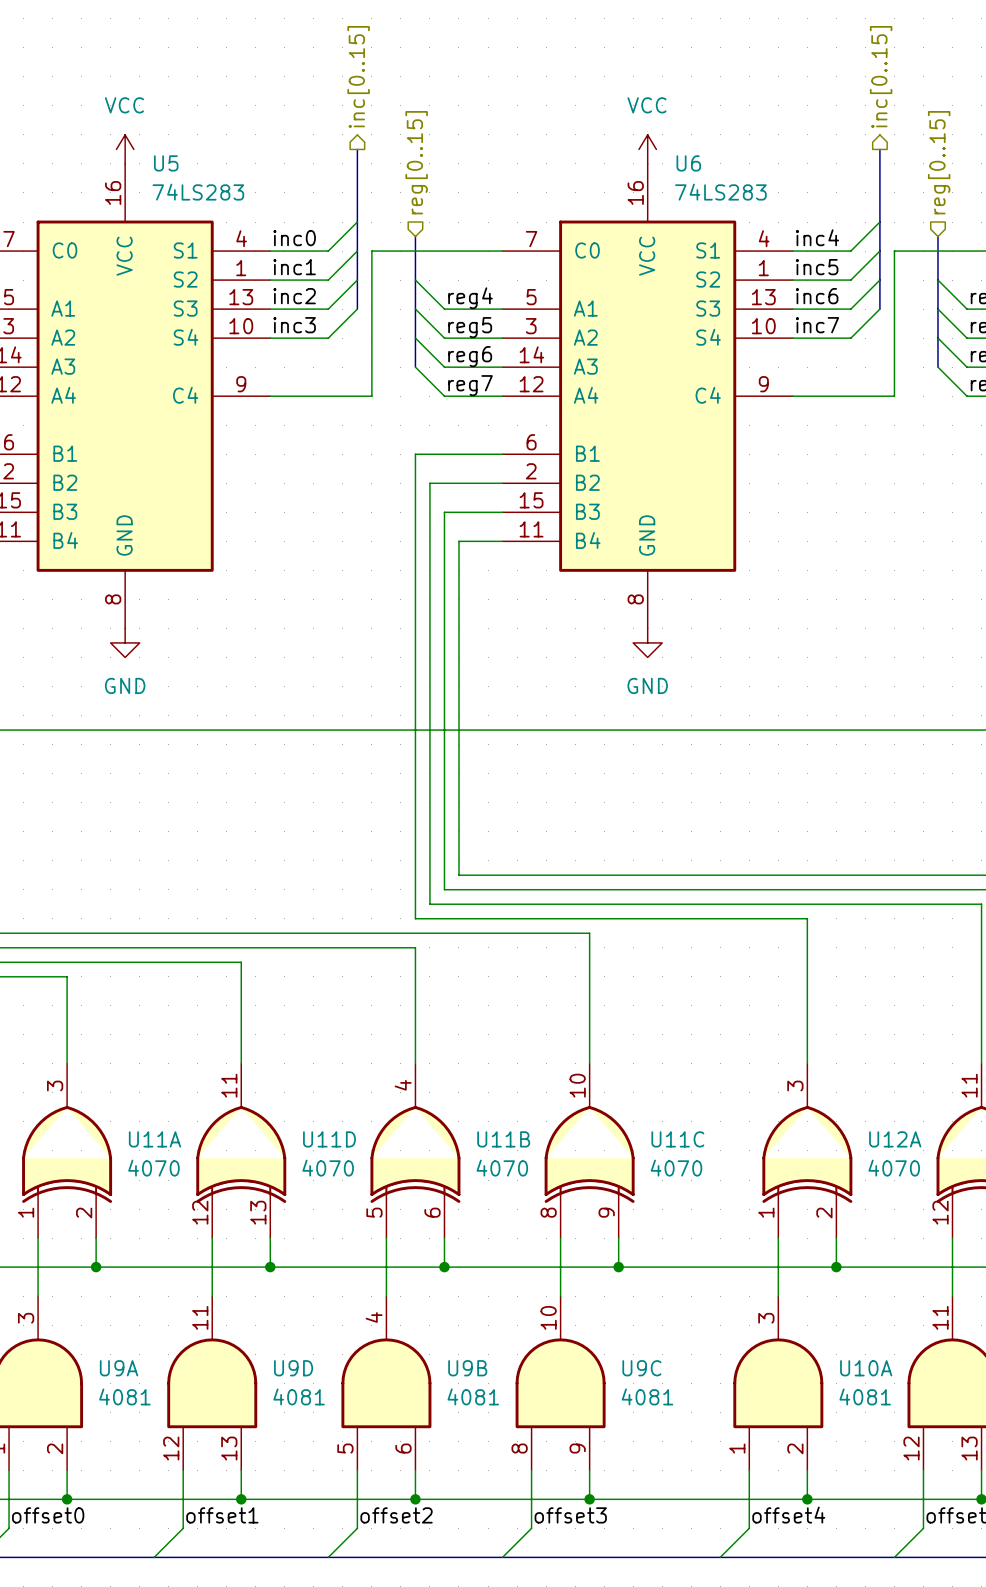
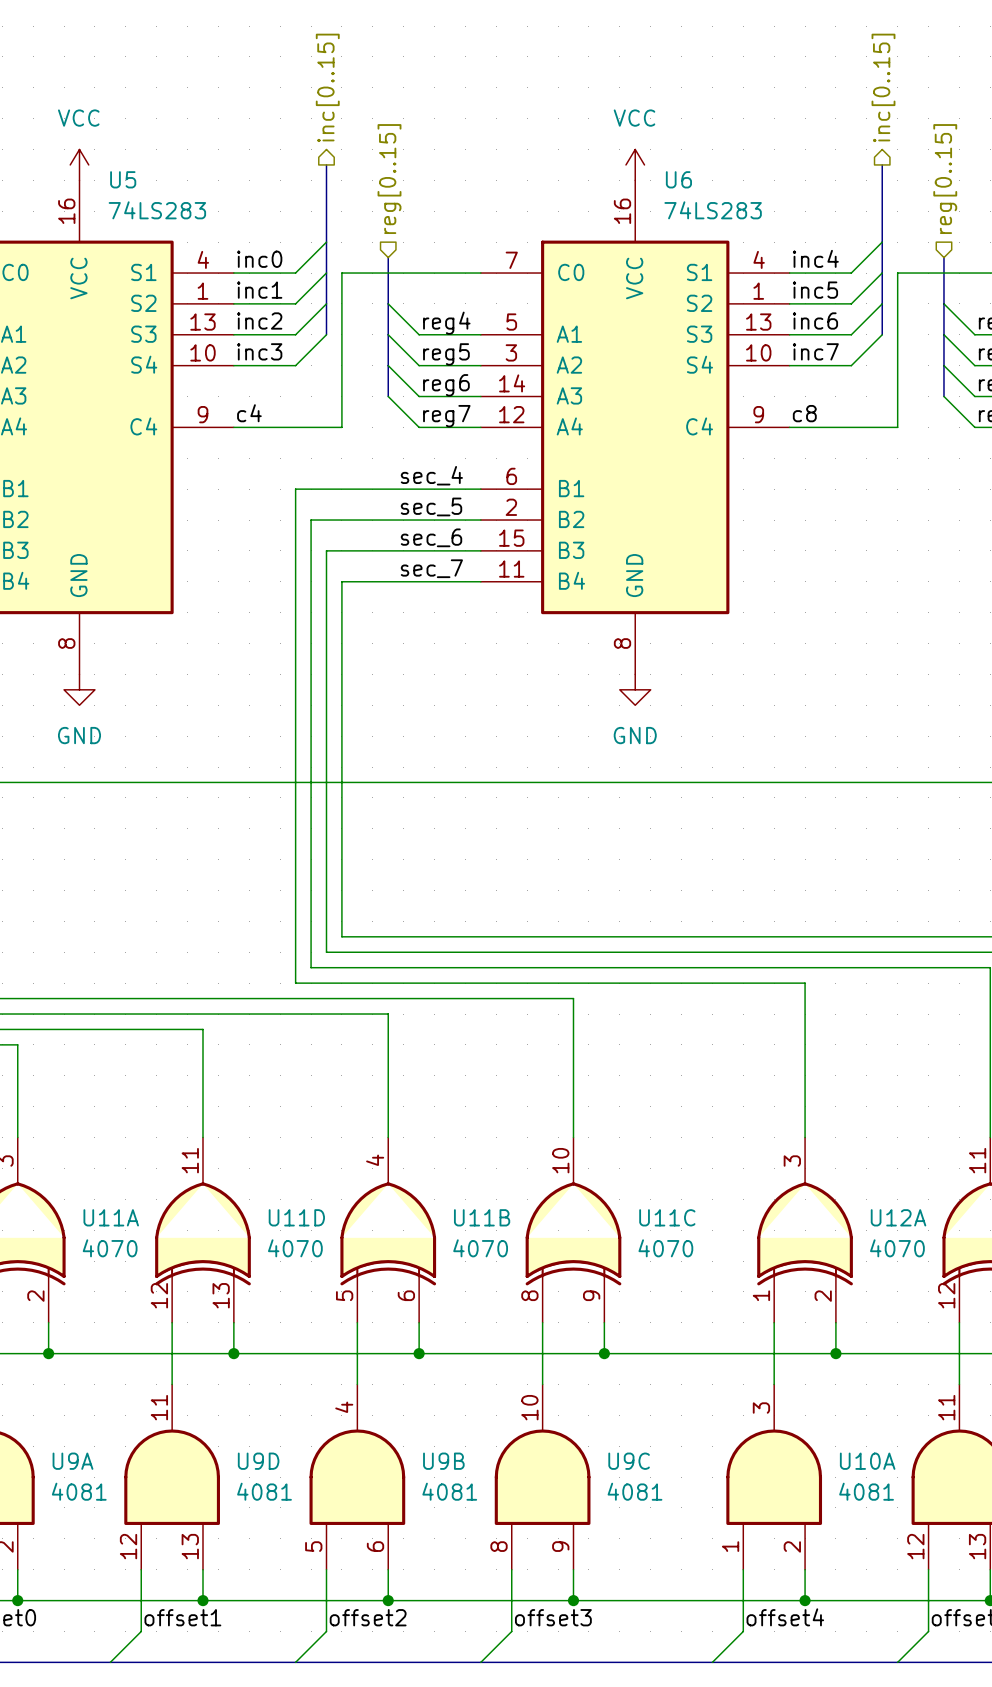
label: none -> c4 (249, 413)
label: none -> c8 (804, 413)
label: none -> sec_4 (431, 475)
wire: (415, 454) (415, 918) -> (388, 489) (295, 489) (295, 983) (388, 983)
label: none -> sec_5 (431, 506)
wire: (429, 483) (429, 904) -> (403, 520) (311, 520) (311, 967) (403, 967)
label: none -> sec_6 (431, 537)
wire: (444, 512) (444, 889) -> (419, 550) (326, 550) (326, 952) (419, 952)
label: none -> sec_7 (431, 568)
wire: (458, 541) (458, 875) -> (434, 581) (341, 581) (341, 936) (434, 936)

